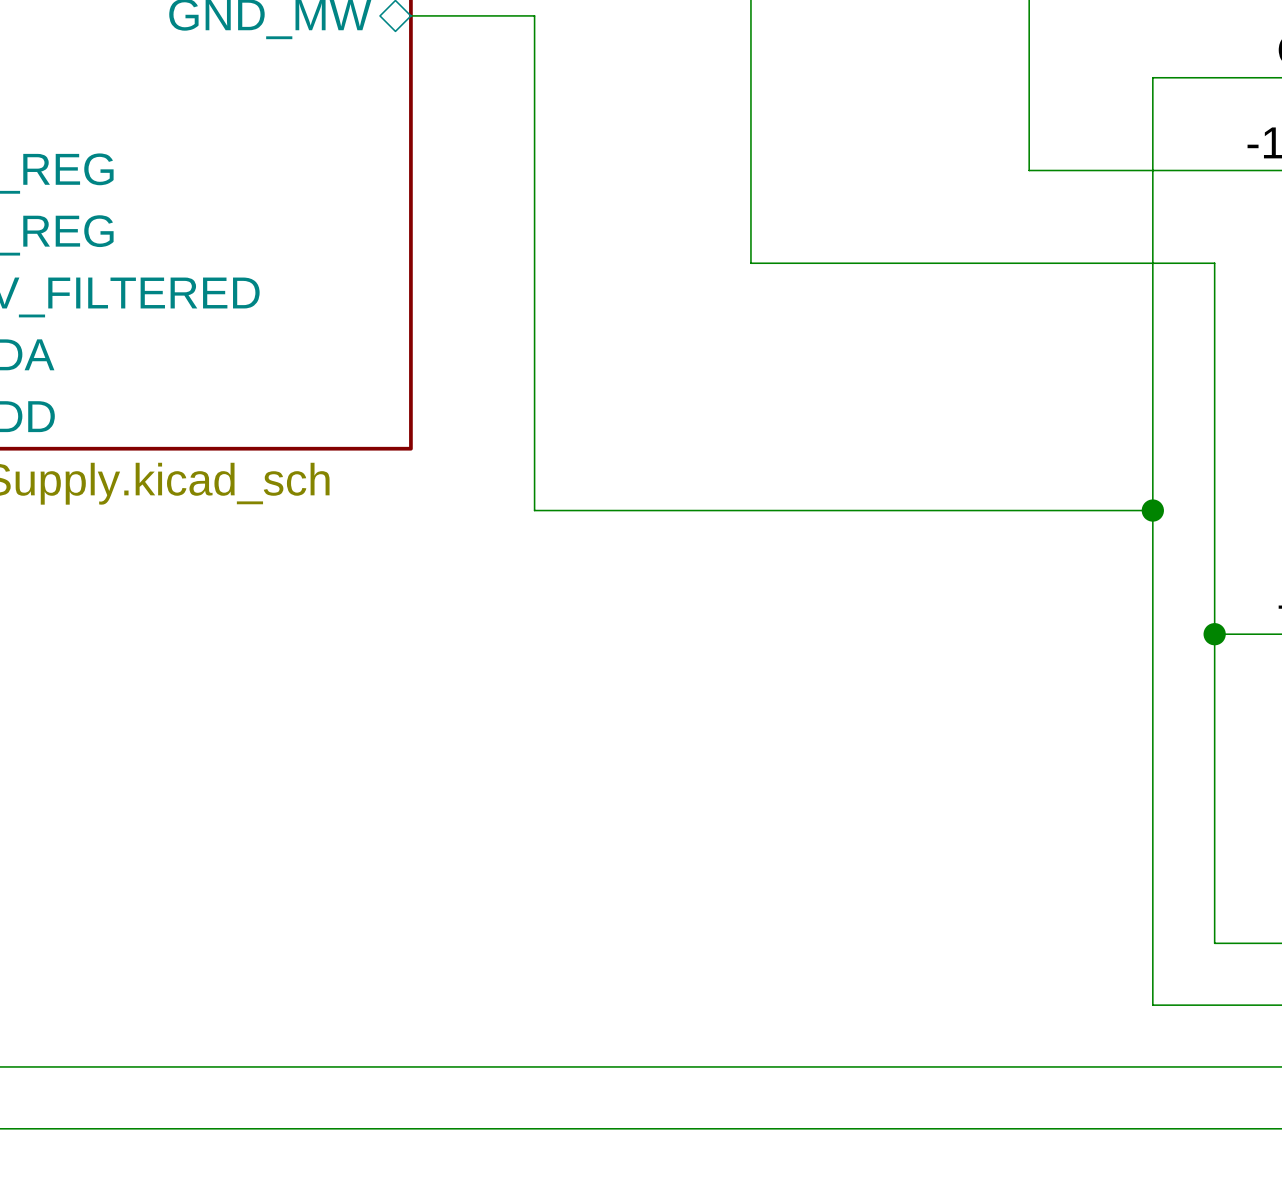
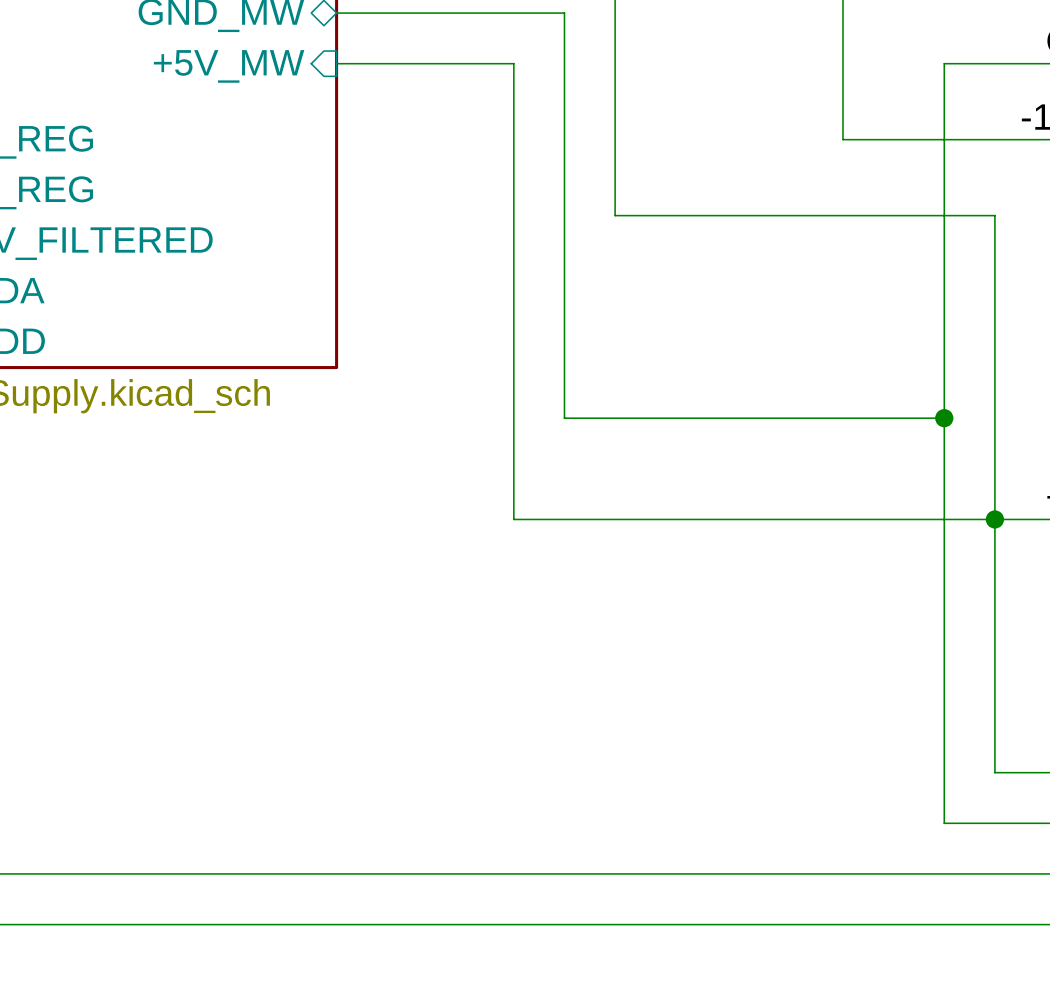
wire: (534, 15) (534, 510) (689, 510) -> (437, 13) (564, 13) (564, 418)
wire: none -> (336, 63) (513, 63) (513, 519) (994, 519)
sheet pin: none -> +5V_MW (229, 66)

